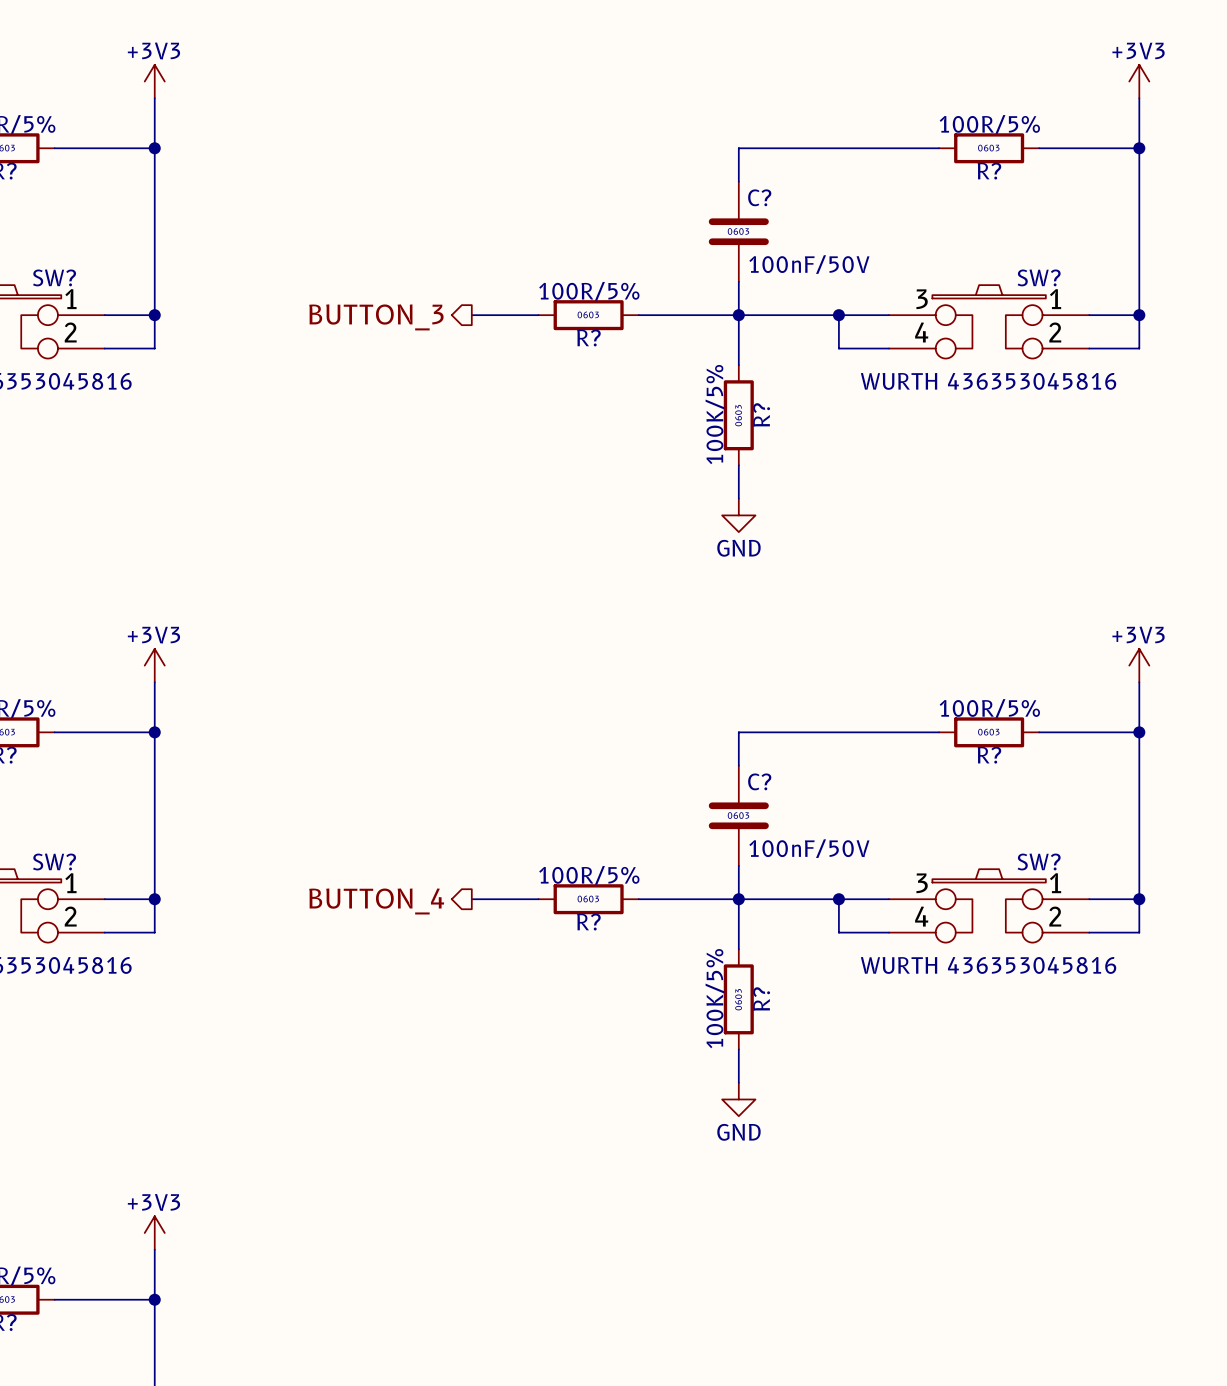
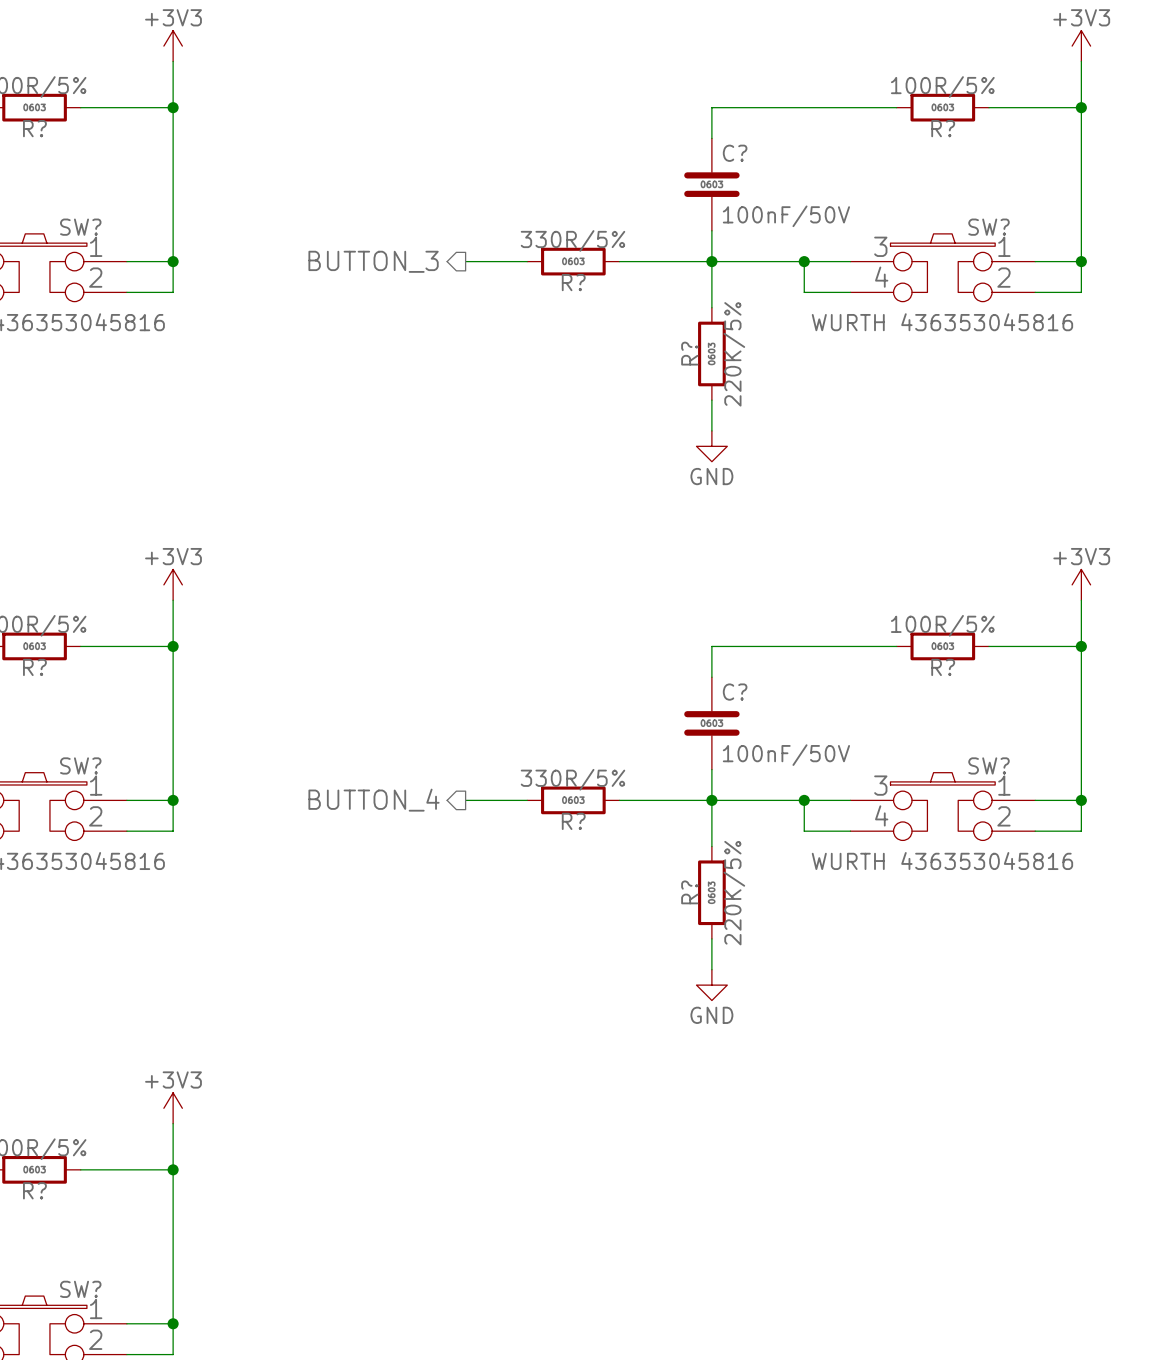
R? value: 100R/5% (589, 291) -> 330R/5% (572, 240)
R? value: 100K/5% (714, 414) -> 220K/5% (734, 354)
R? name position: R? (761, 414) -> R? (689, 353)
R? value: 100R/5% (589, 875) -> 330R/5% (572, 779)
R? value: 100K/5% (714, 998) -> 220K/5% (734, 893)
R? name position: R? (761, 999) -> R? (689, 892)

